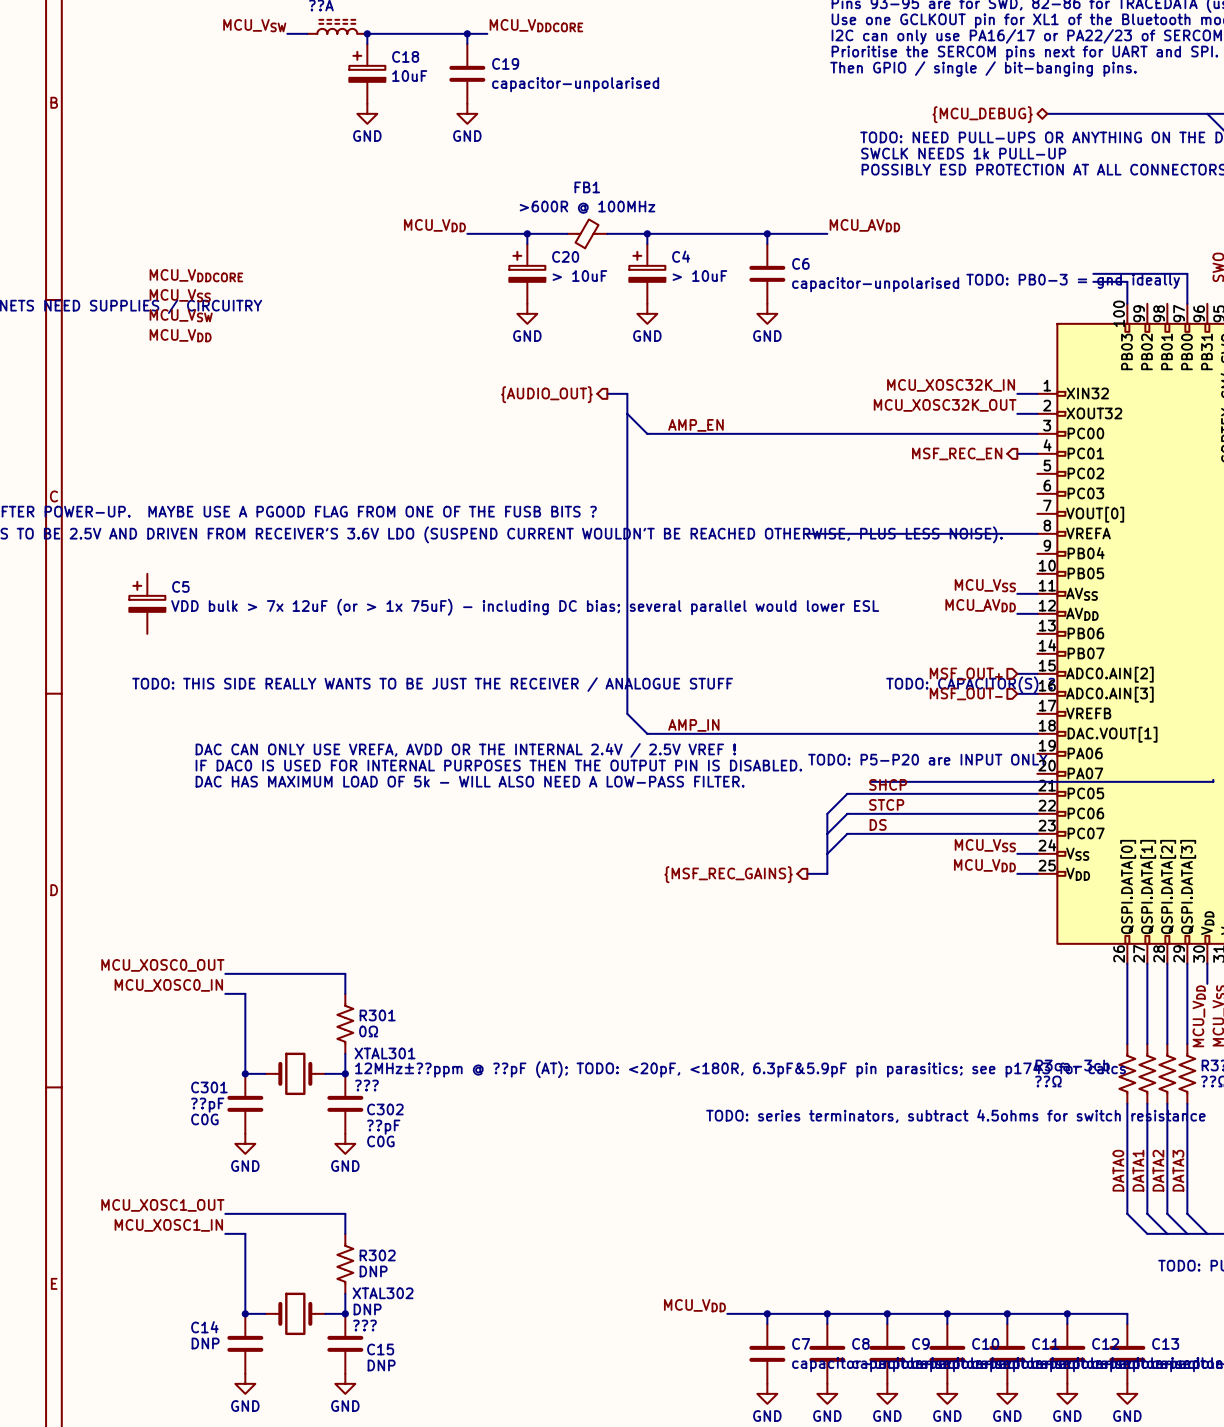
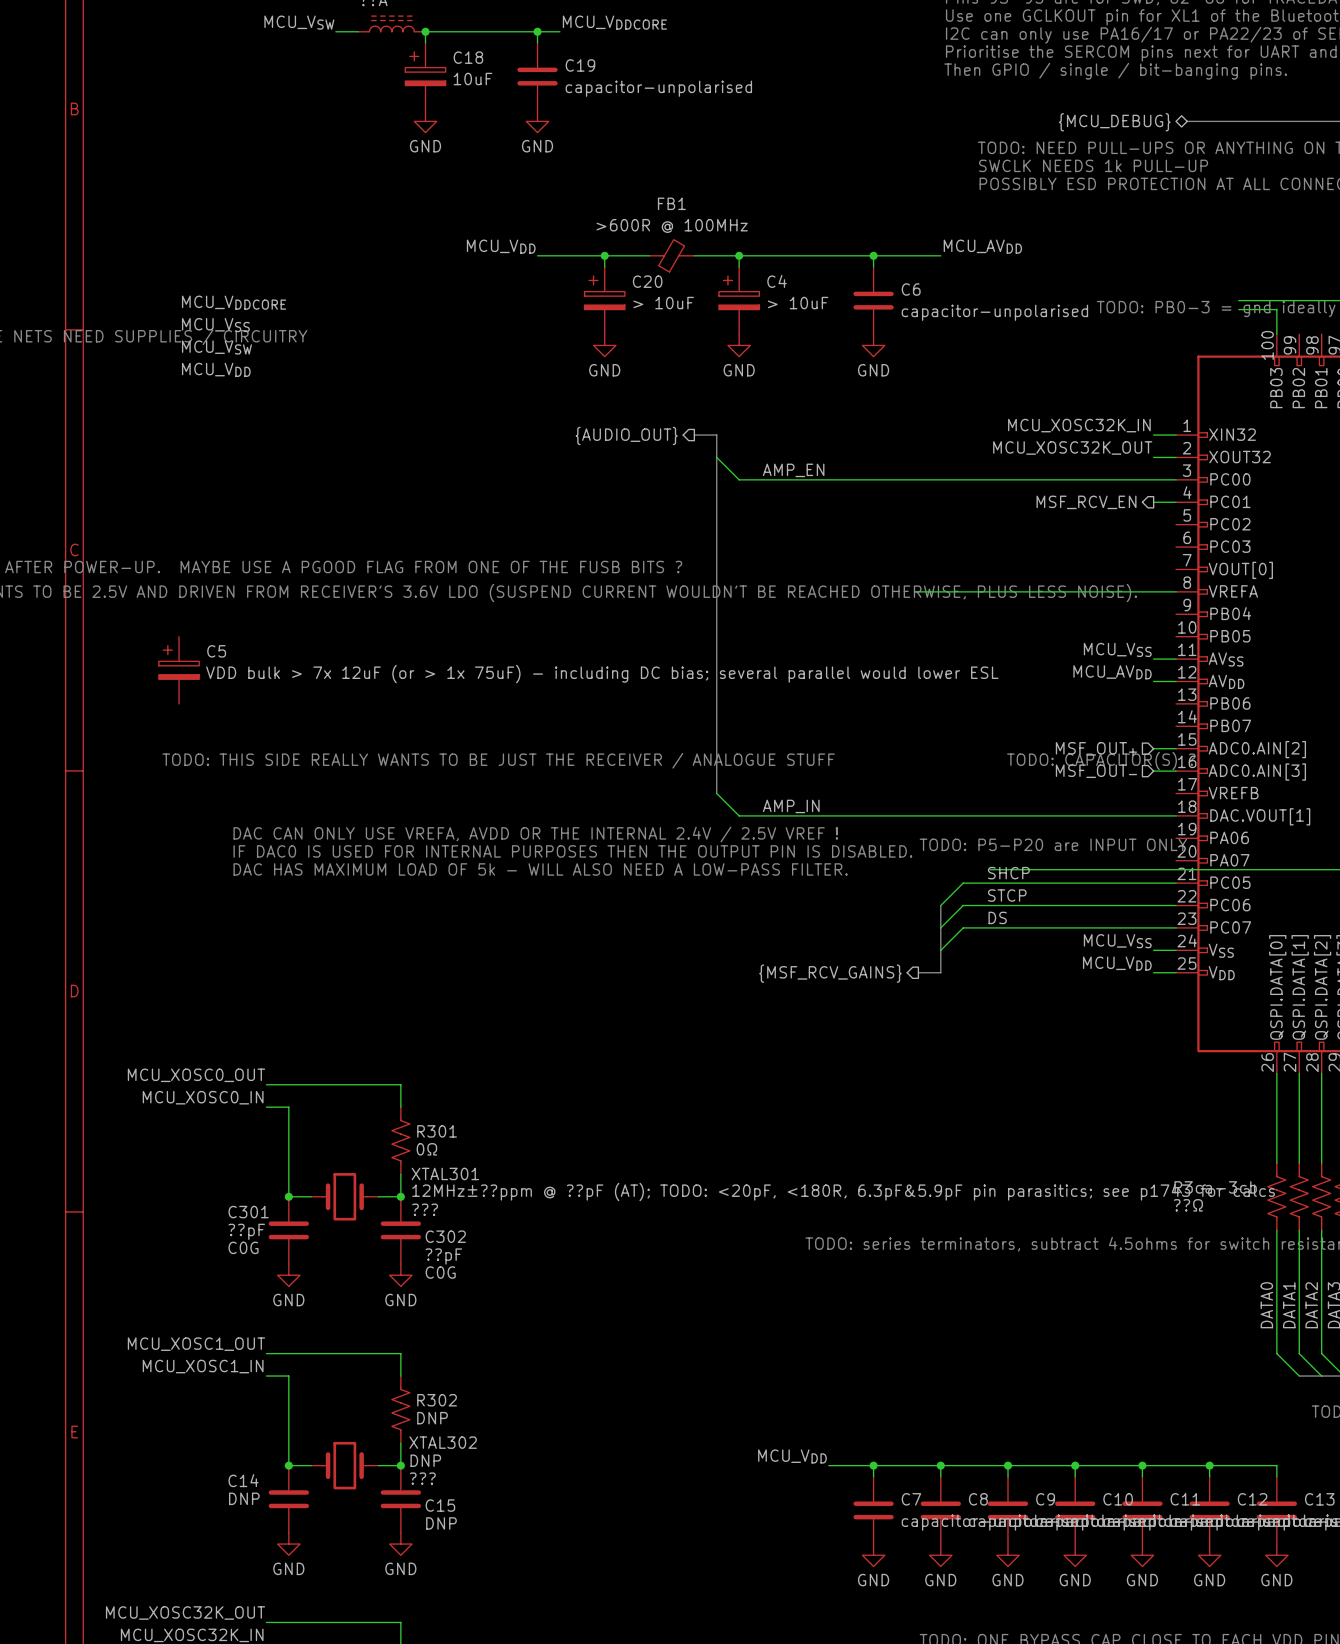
hierarchical label: MSF_REC_EN (957, 453) -> MSF_RCV_EN (1086, 502)
hierarchical label: {MSF_REC_GAINS} (728, 874) -> {MSF_RCV_GAINS} (830, 973)

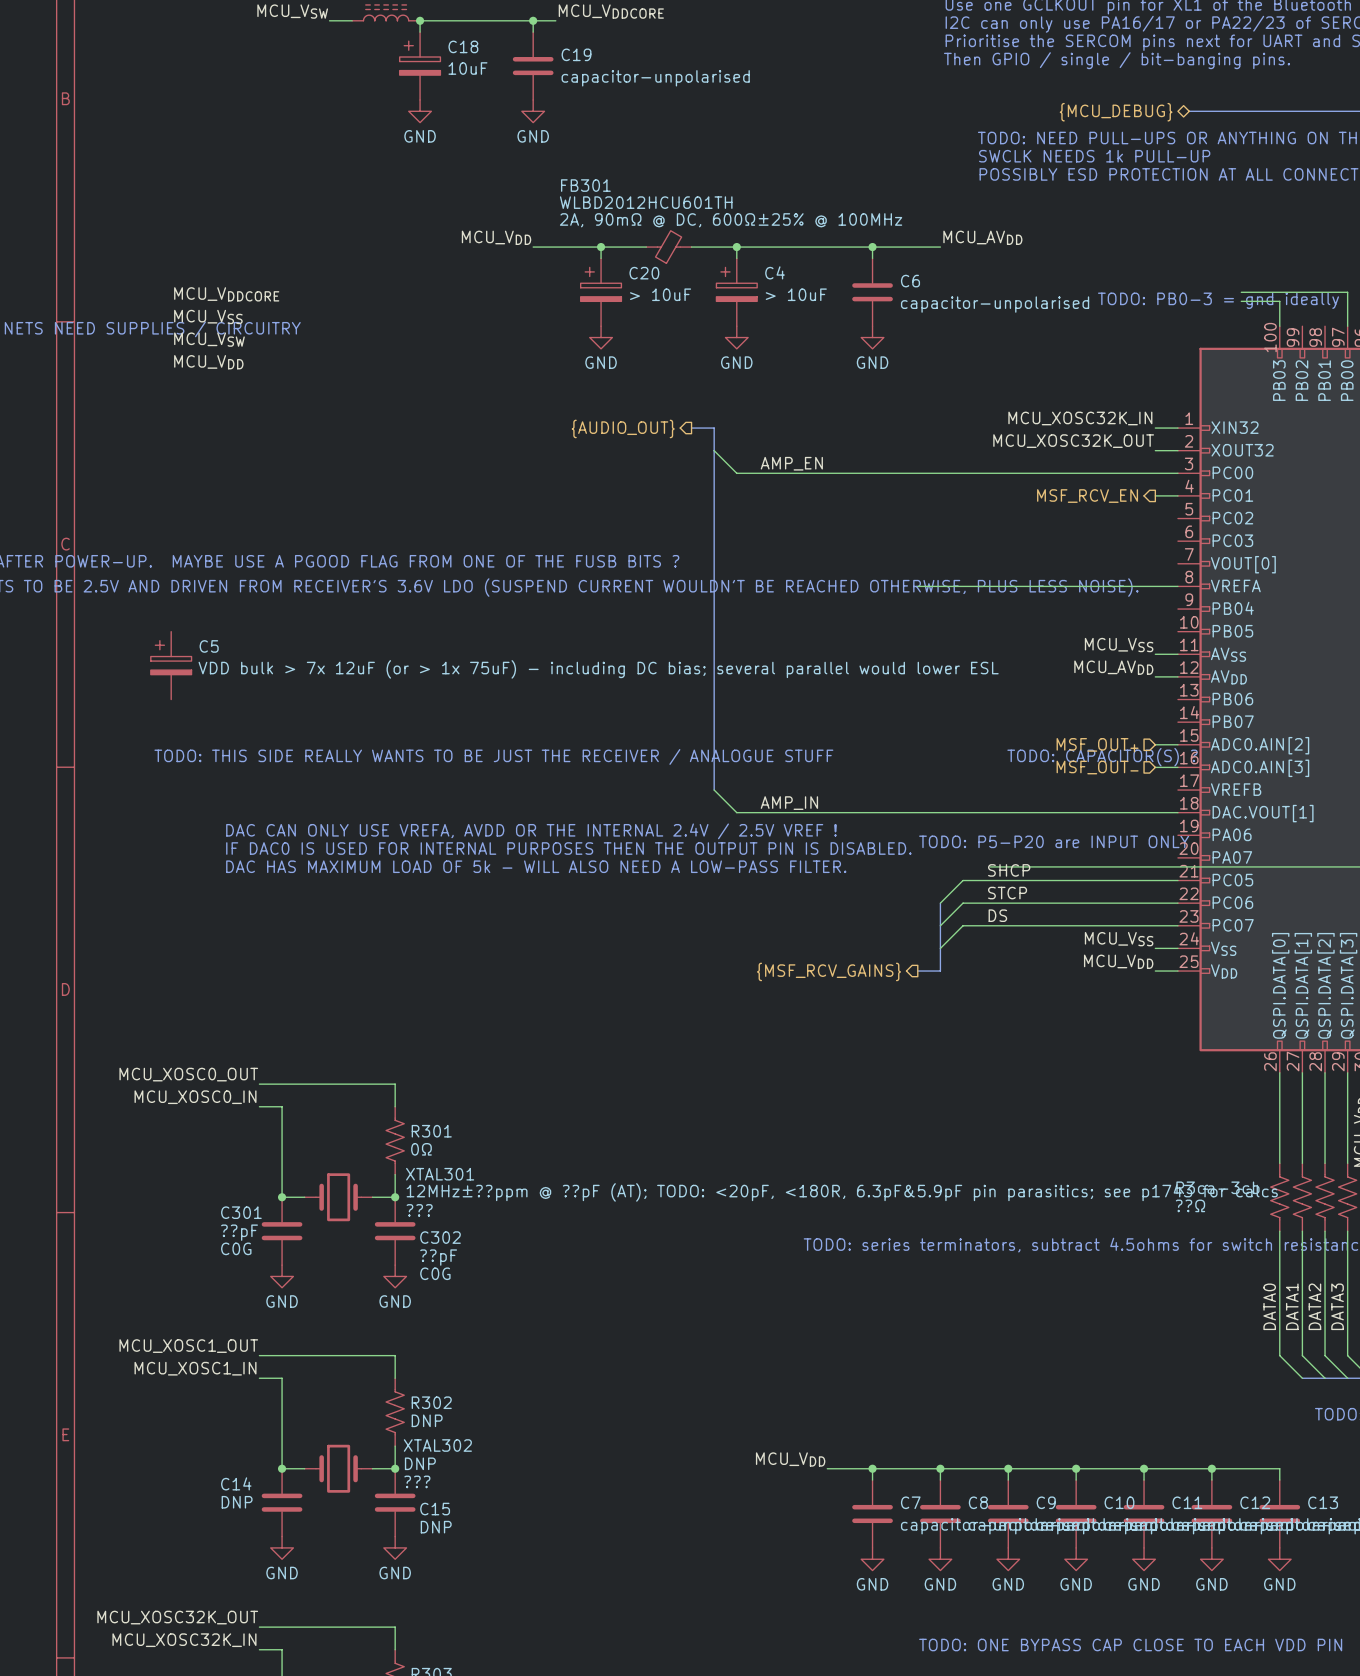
FB1 name: FB1 (671, 203) -> FB301 (585, 185)
FB1 value: >600R @ 100MHz (672, 226) -> WLBD2012HCU601TH (646, 202)
FB1 text: none -> 2A, 90mΩ @ DC, 600Ω±25% @ 100MHz (731, 220)

